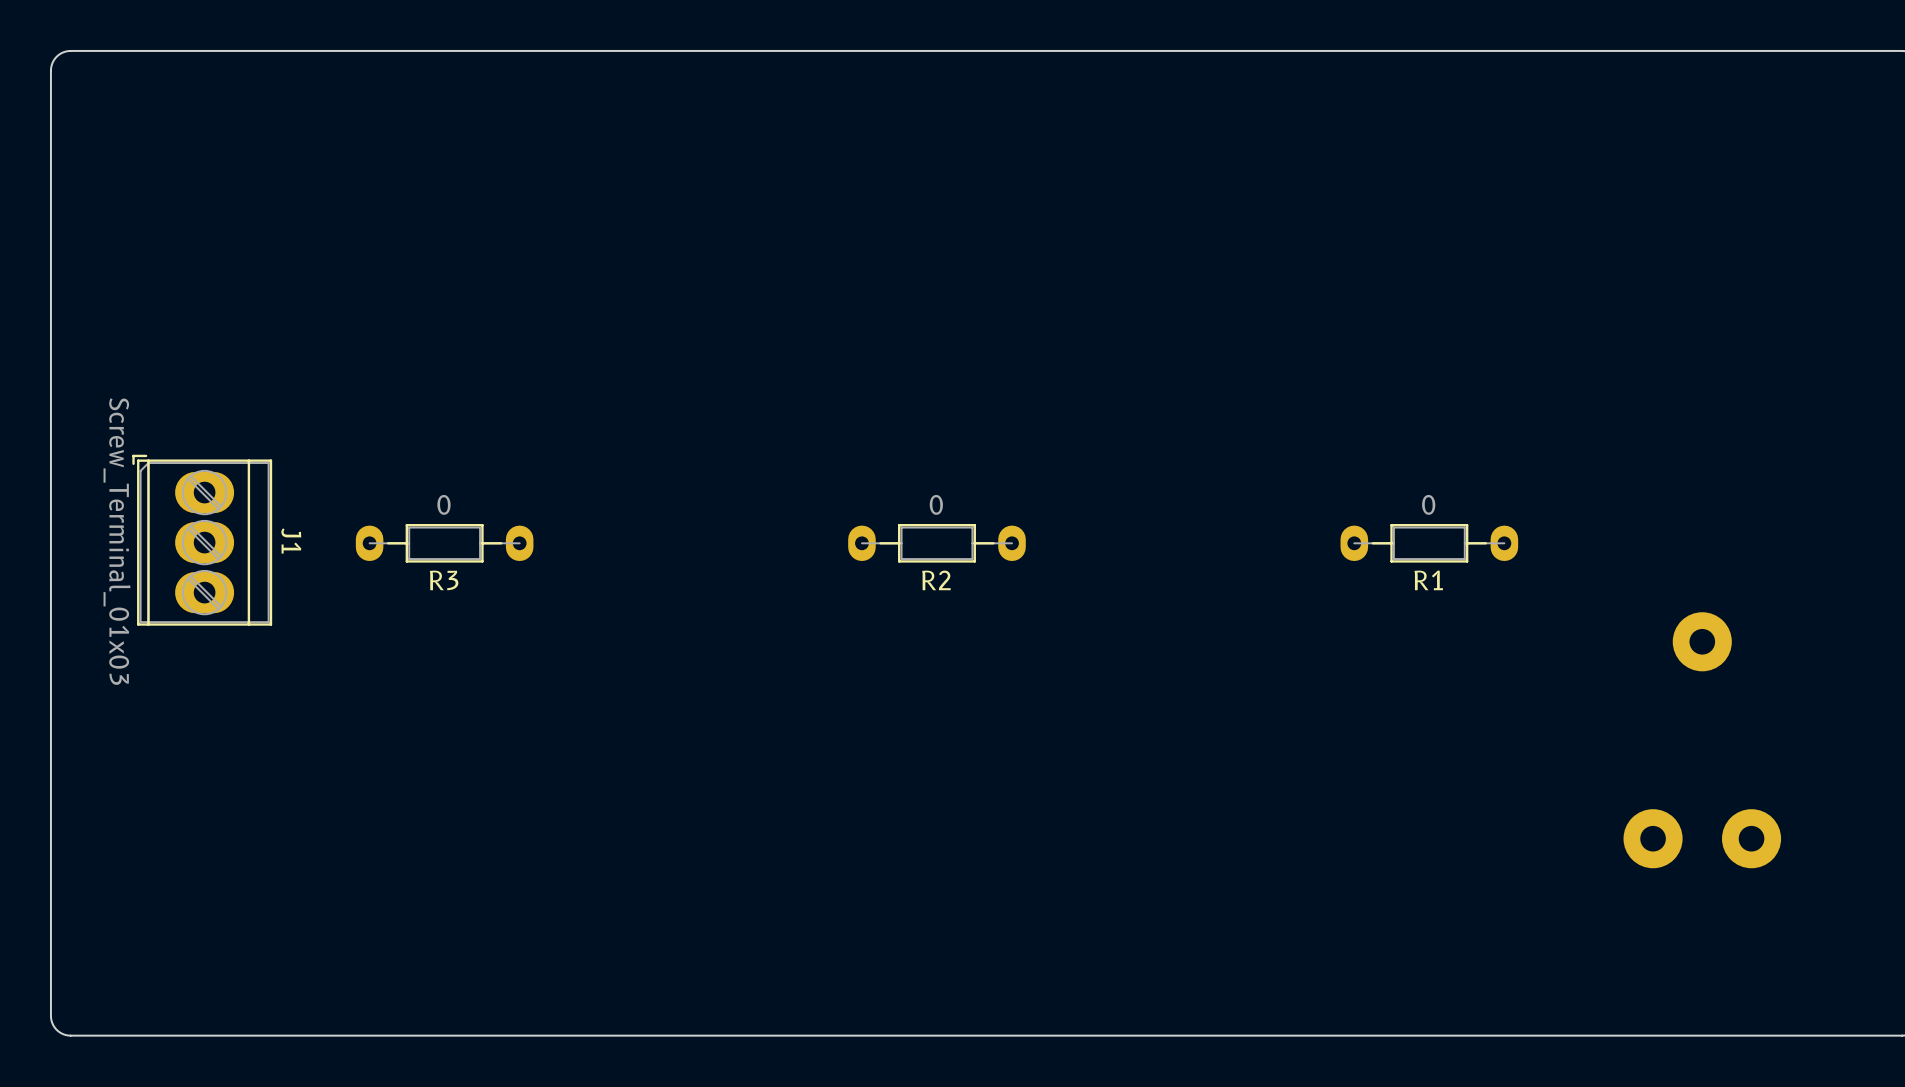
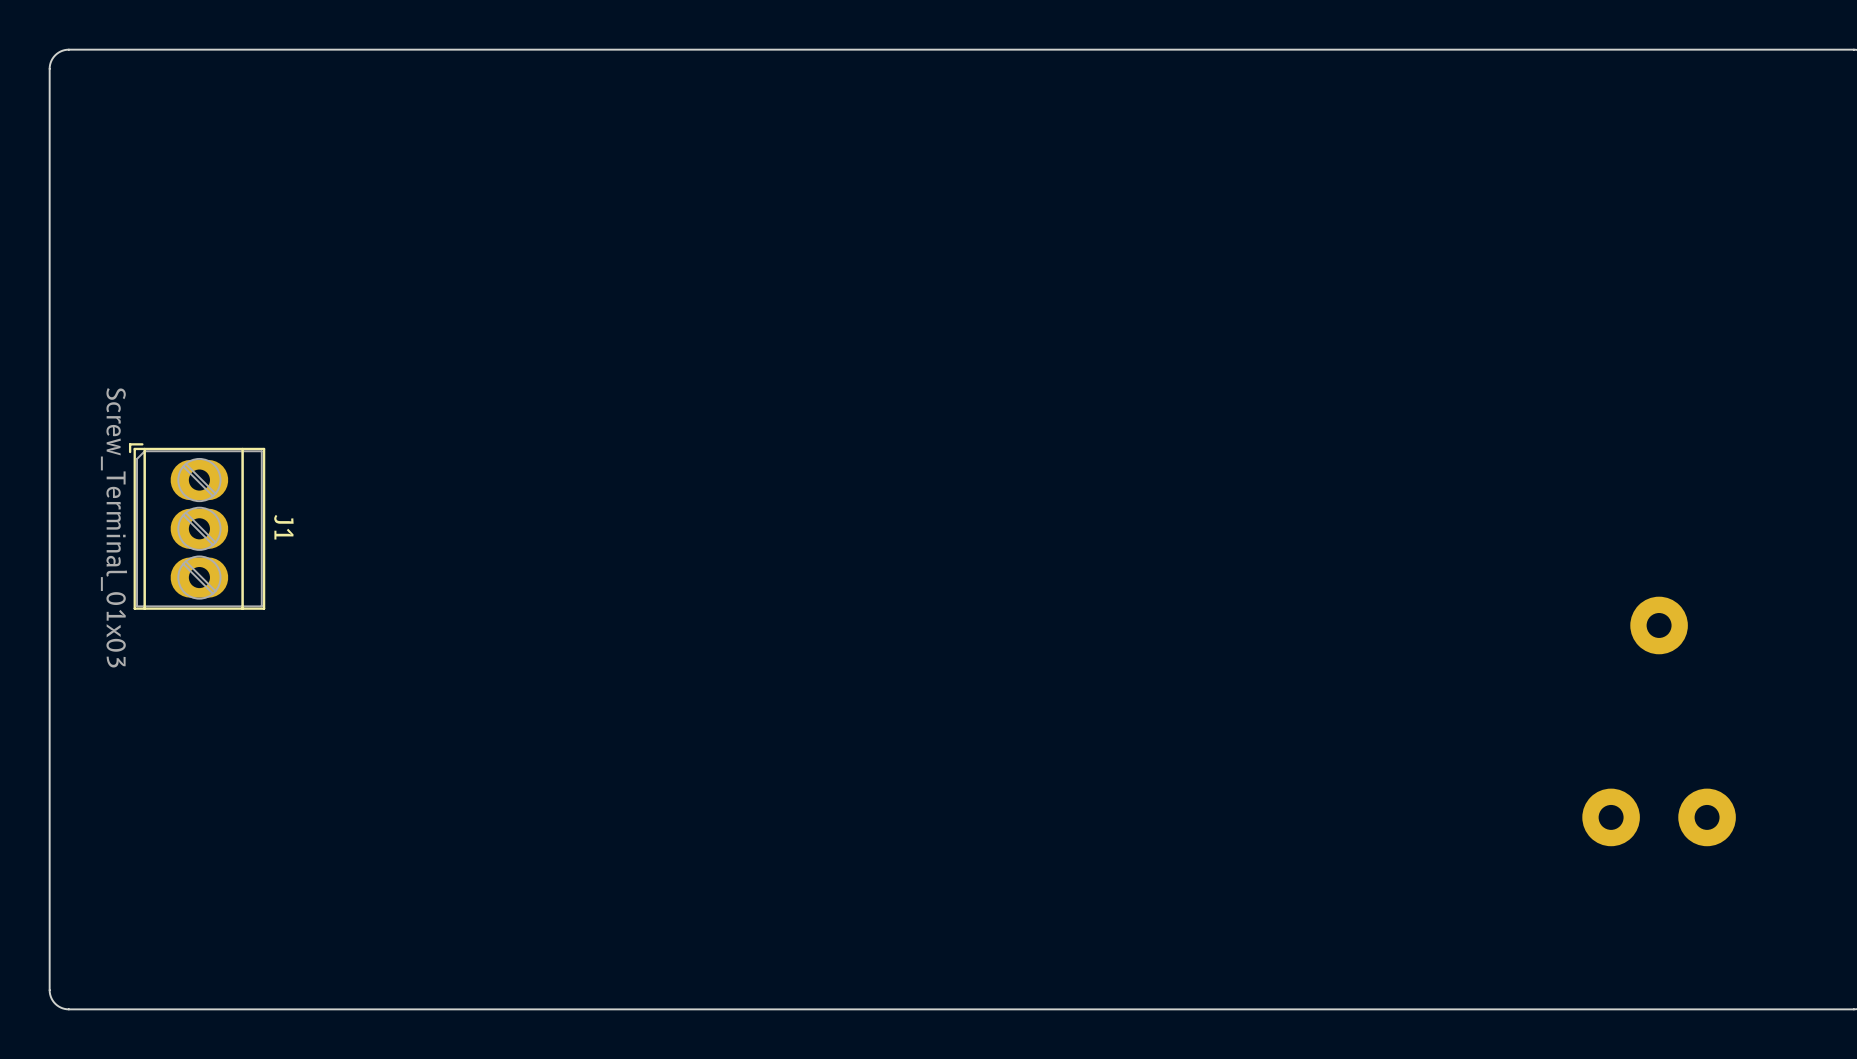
R3: 0 (444, 543) -> none
R2: 0 (936, 543) -> none
R1: 0 (1429, 543) -> none

